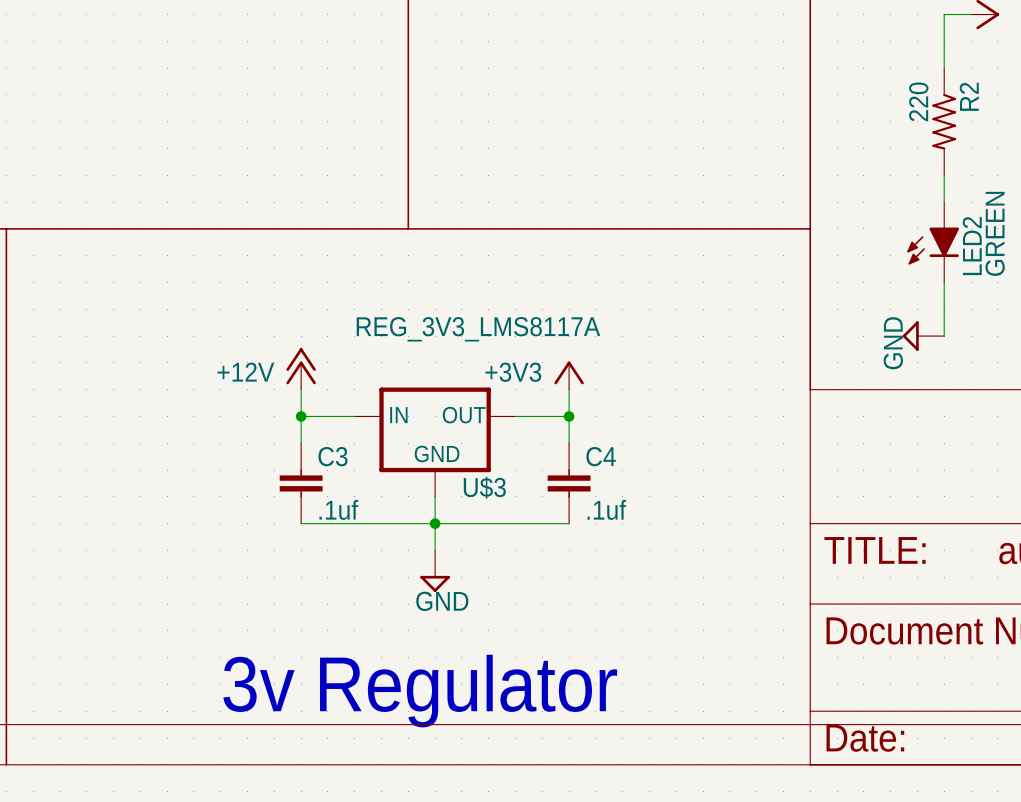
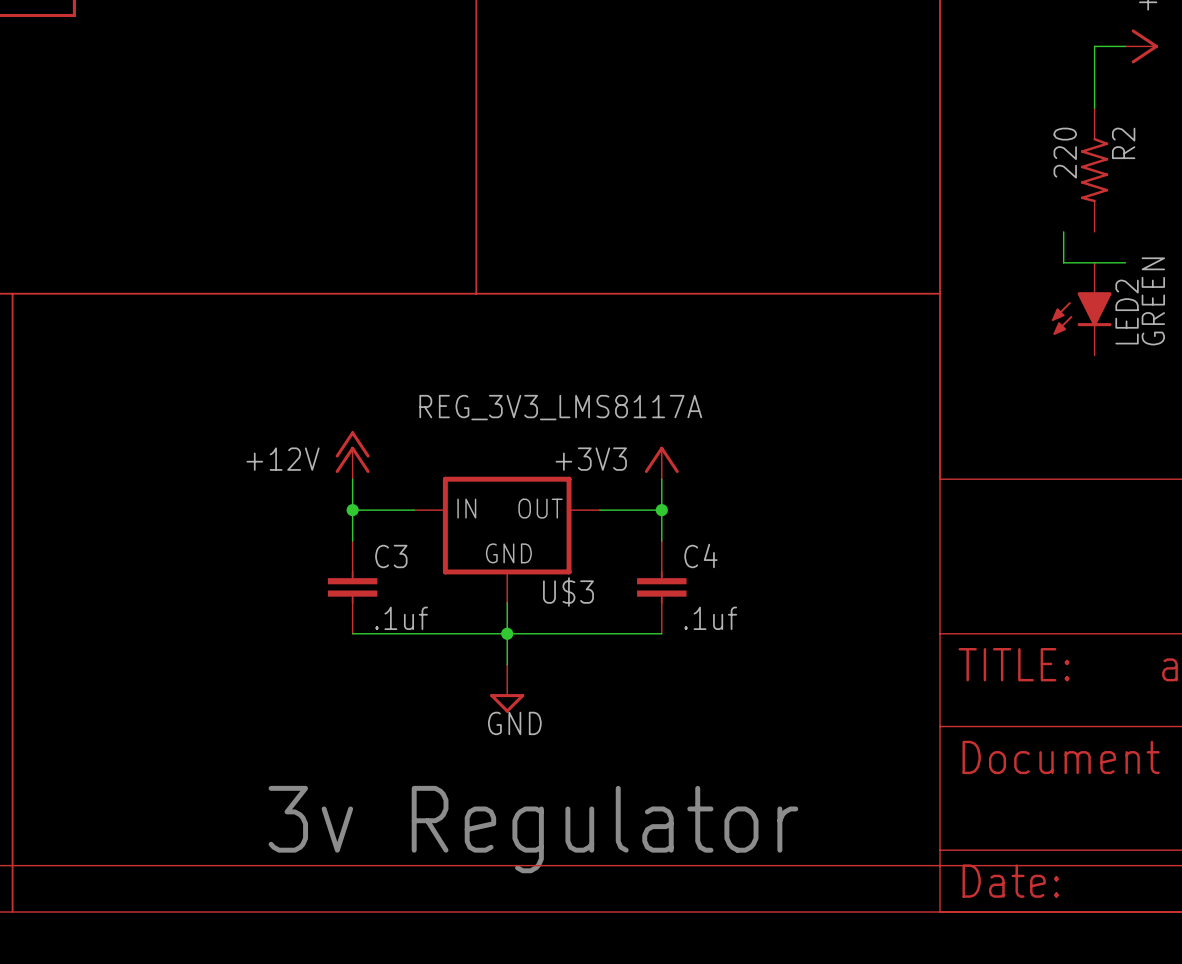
wire: none -> (1063, 231) (1063, 262) (1125, 262)
wire: (944, 175) (944, 202) -> none
wire: (944, 282) (944, 336) -> none
power symbol: GND (923, 336) -> none

